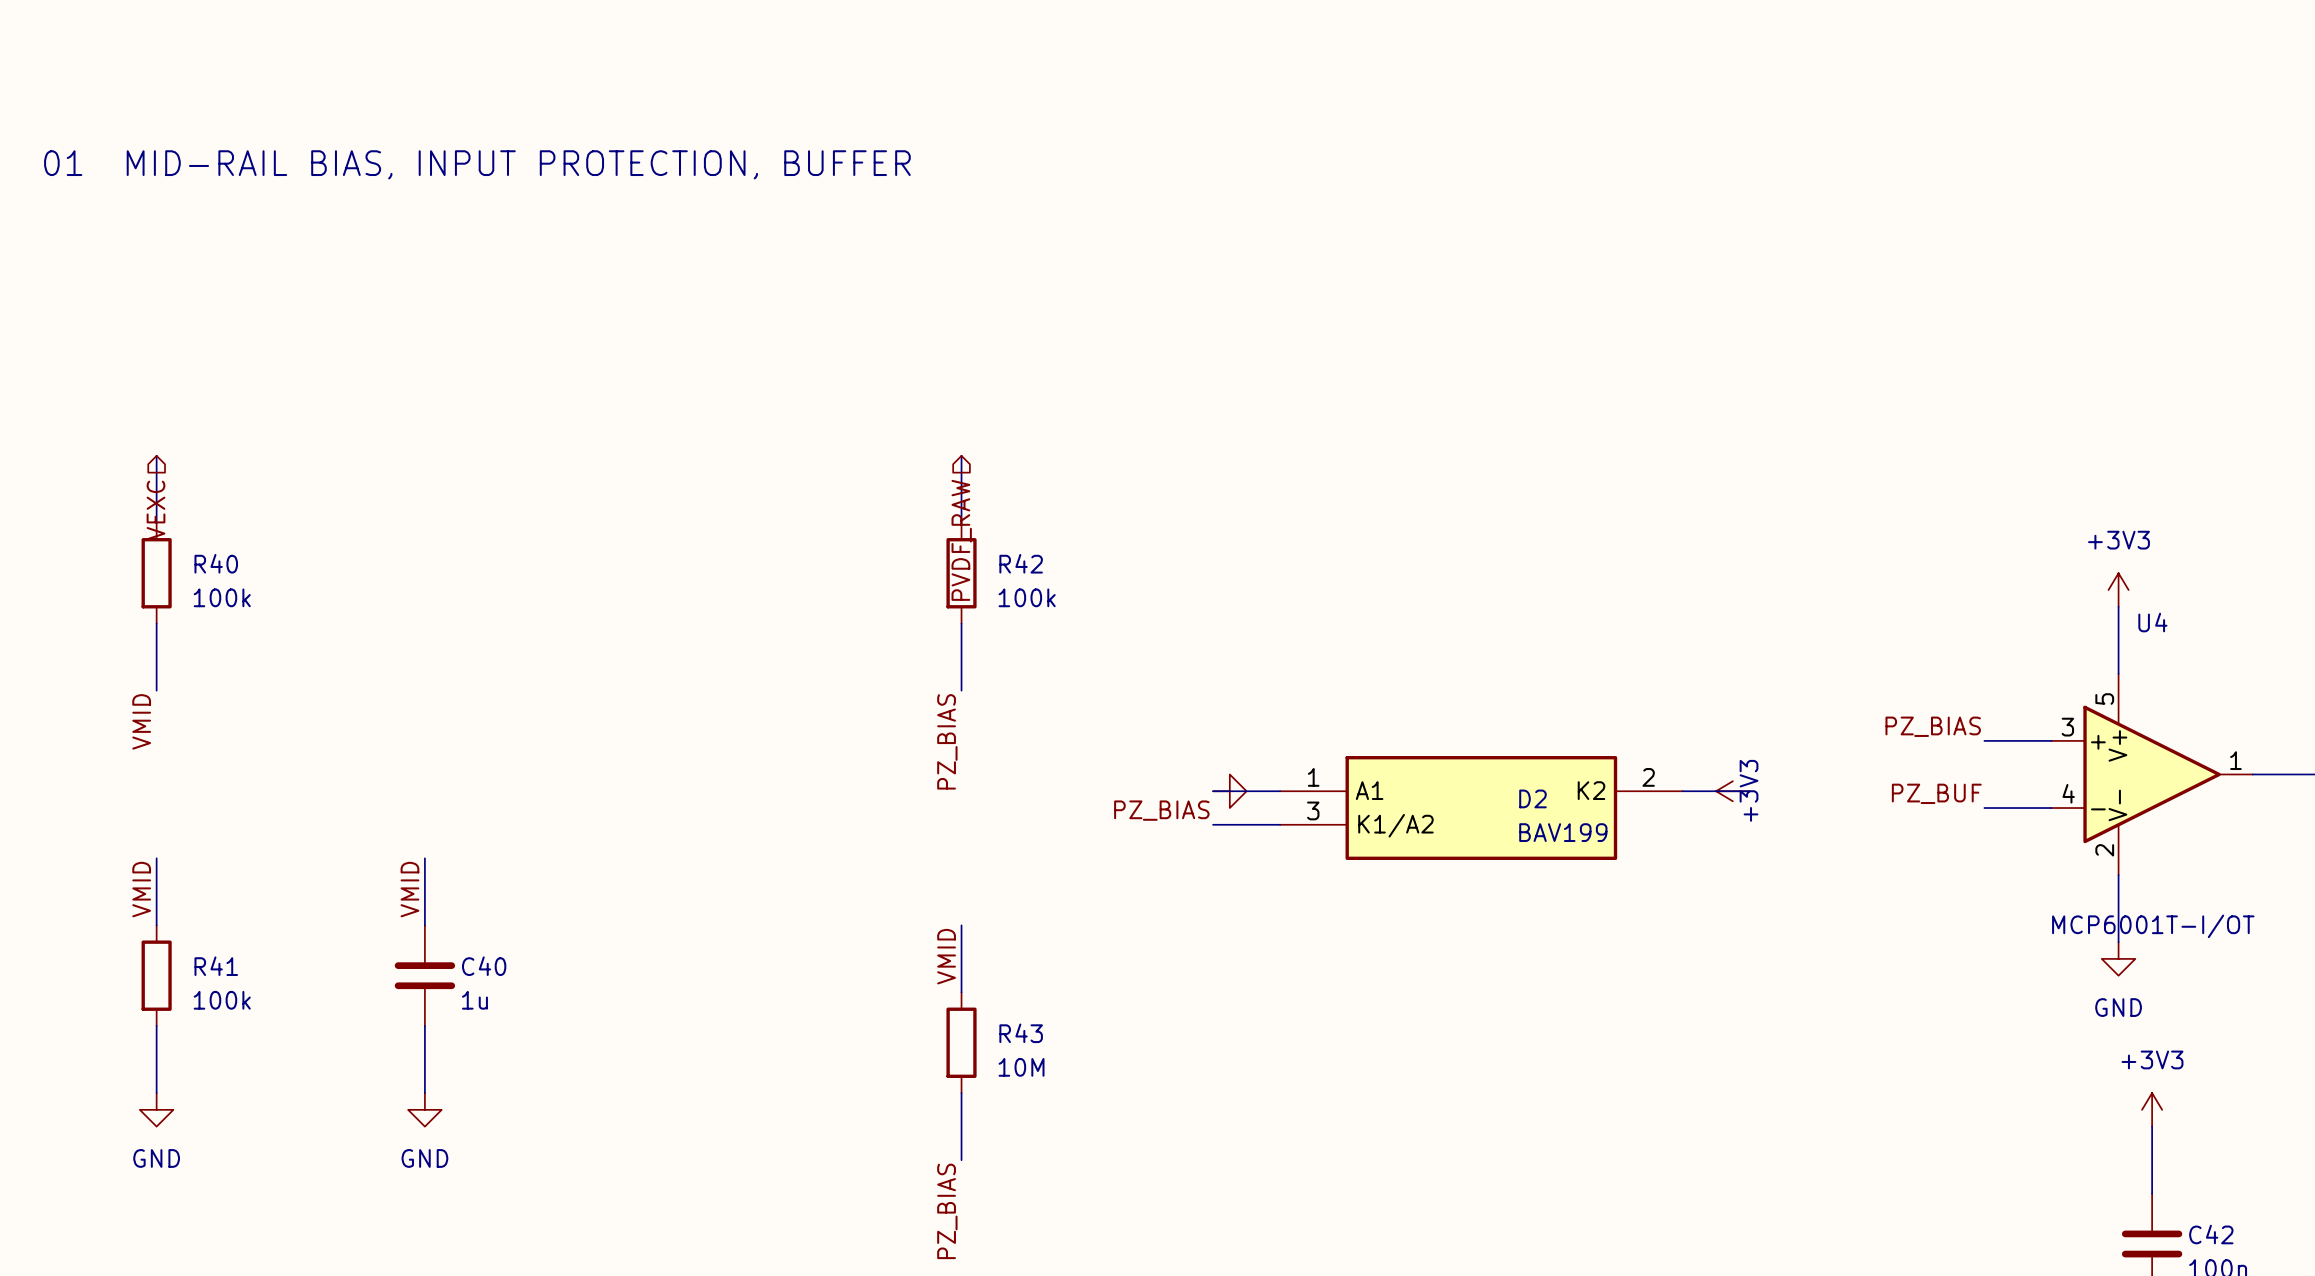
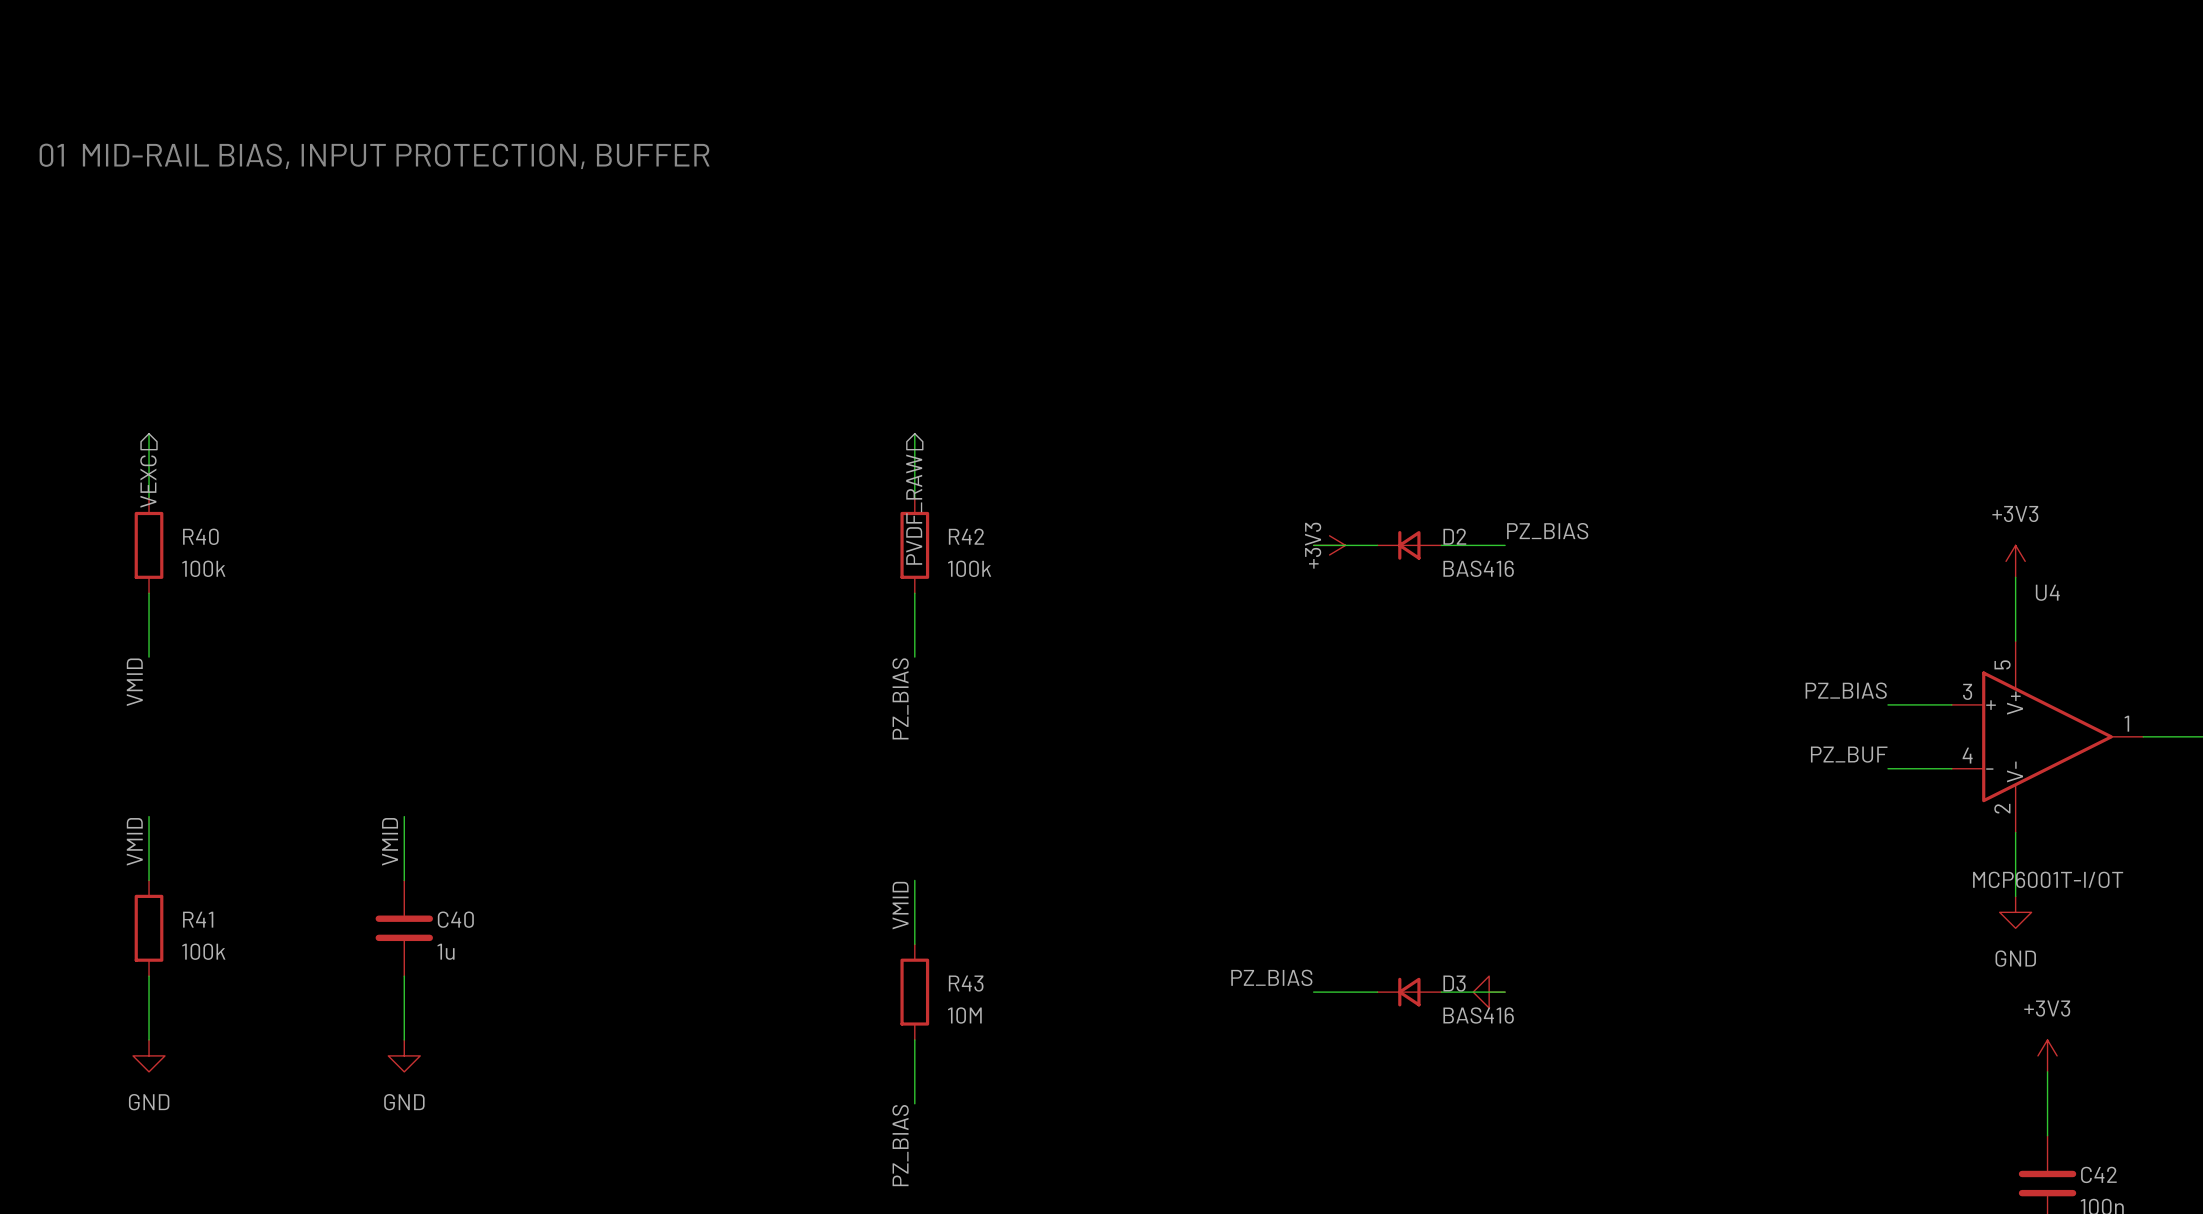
label: none -> PZ_BIAS (1547, 531)
power symbol: none -> +3V3 (1329, 545)
D2 symbol: [1280, 756, 1683, 860] -> [1377, 531, 1442, 560]
wire: (1213, 791) (1280, 791) -> (1313, 545) (1377, 545)
power symbol: (1229, 791) -> none
wire: (1682, 791) (1749, 791) -> (1441, 545) (1505, 545)
power symbol: +3V3 (1732, 791) -> none
label: PZ_BIAS (1161, 810) -> none
wire: (1213, 824) (1280, 824) -> (1313, 992) (1377, 992)
D2 value: BAV199 (1563, 832) -> BAS416 (1478, 568)
label: none -> PZ_BIAS (1271, 977)
D3: none -> BAS416 (1409, 992)
wire: none -> (1441, 992) (1505, 992)
power symbol: none -> (1489, 992)

